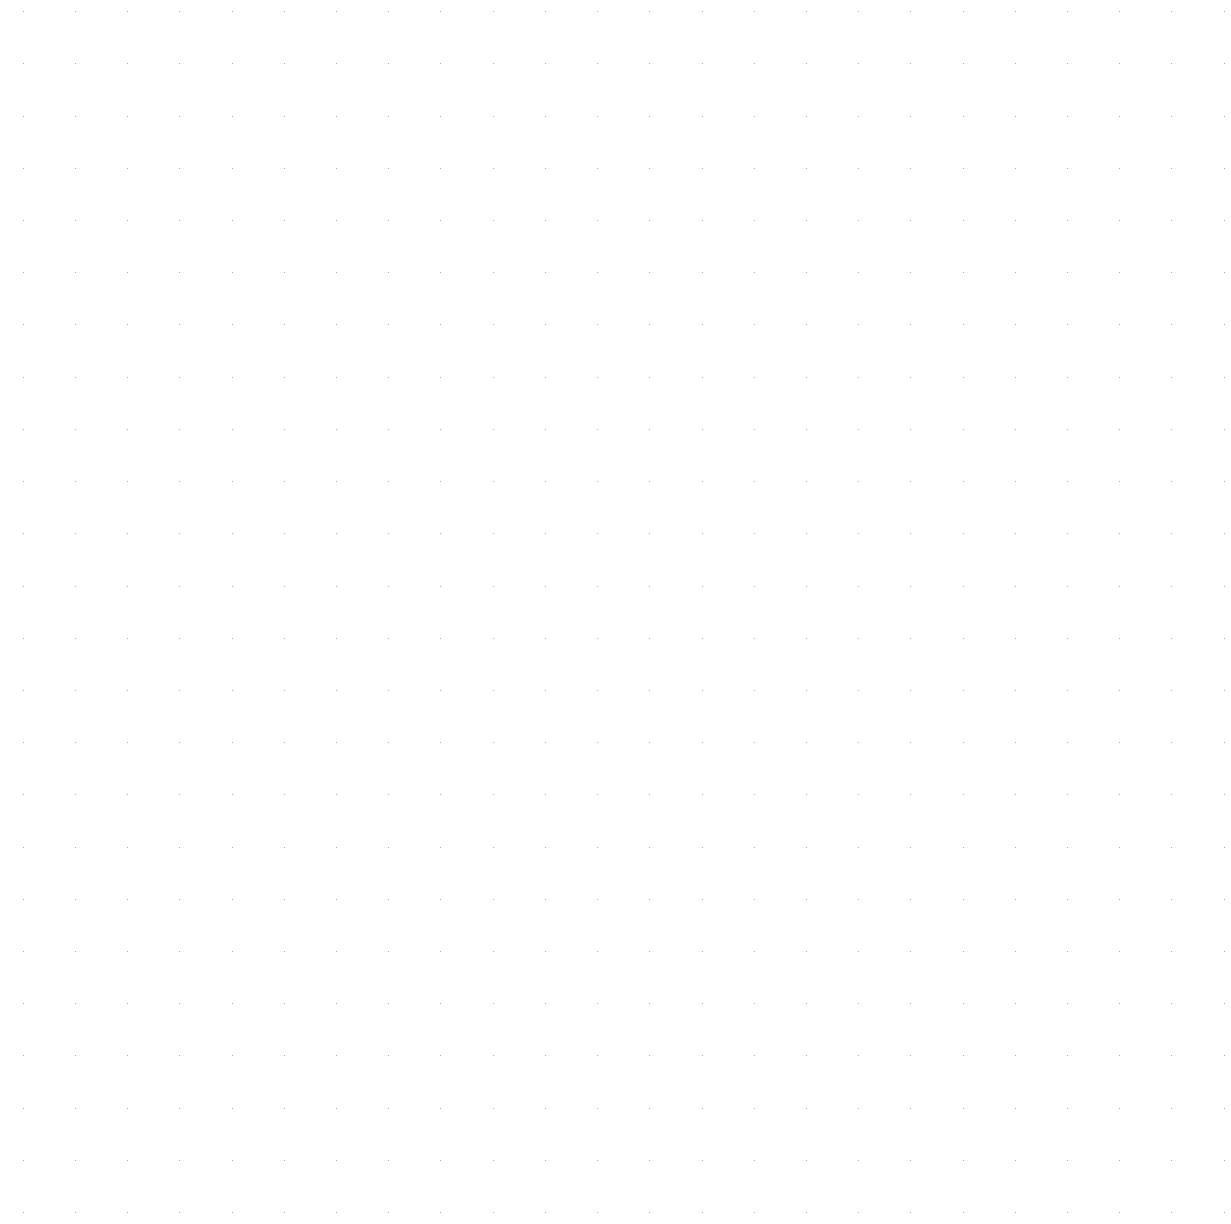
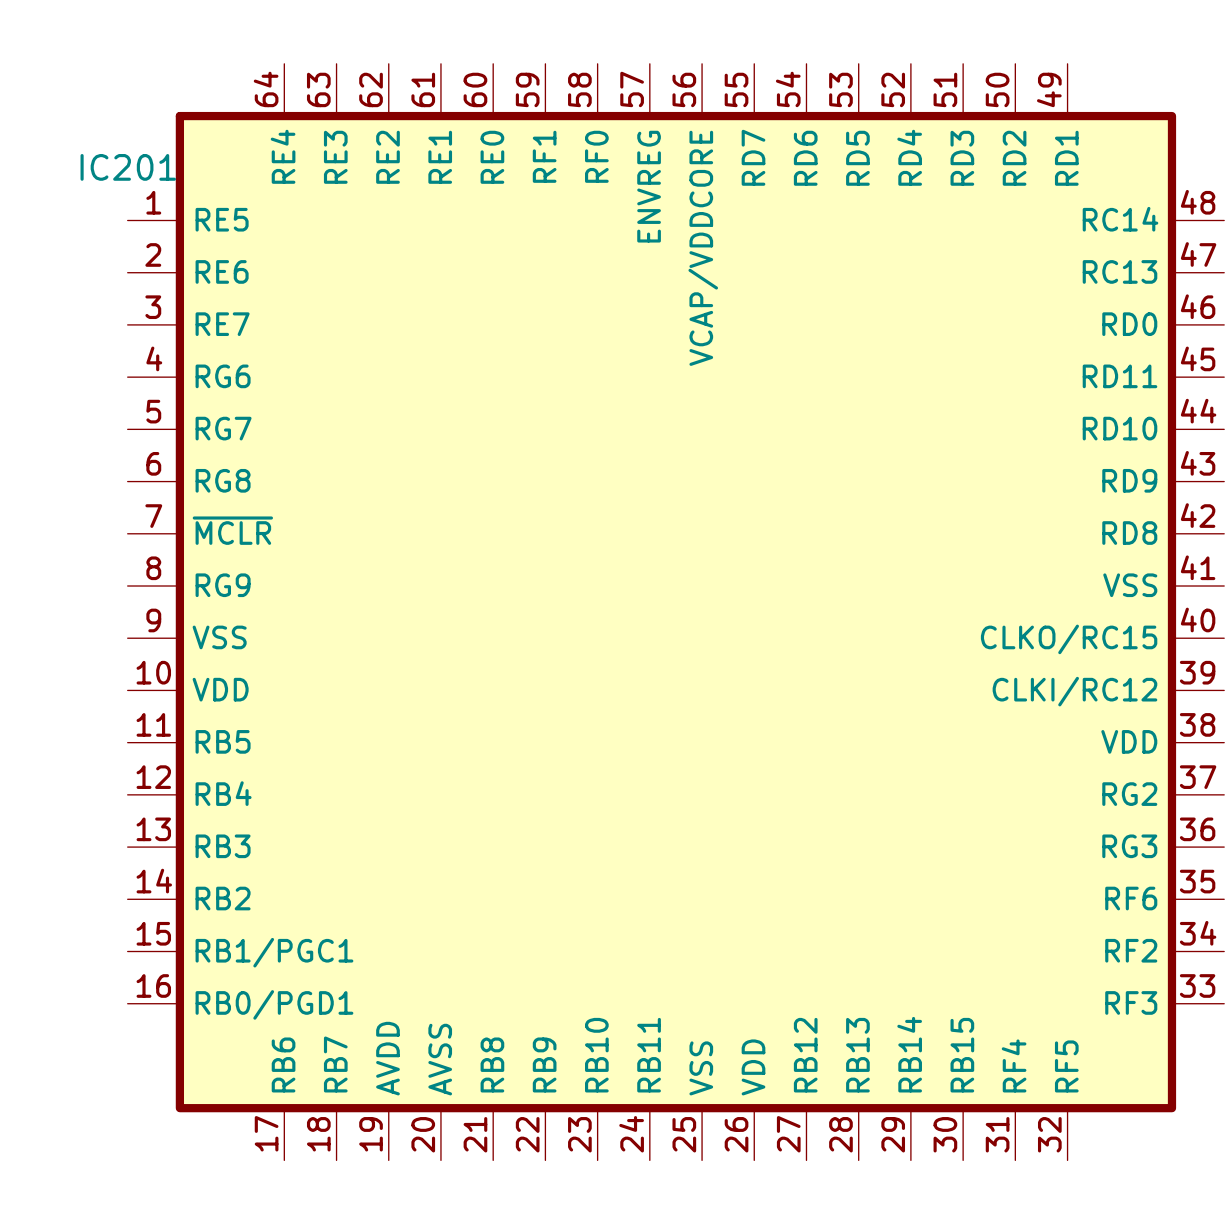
IC201: none -> (675, 612)

